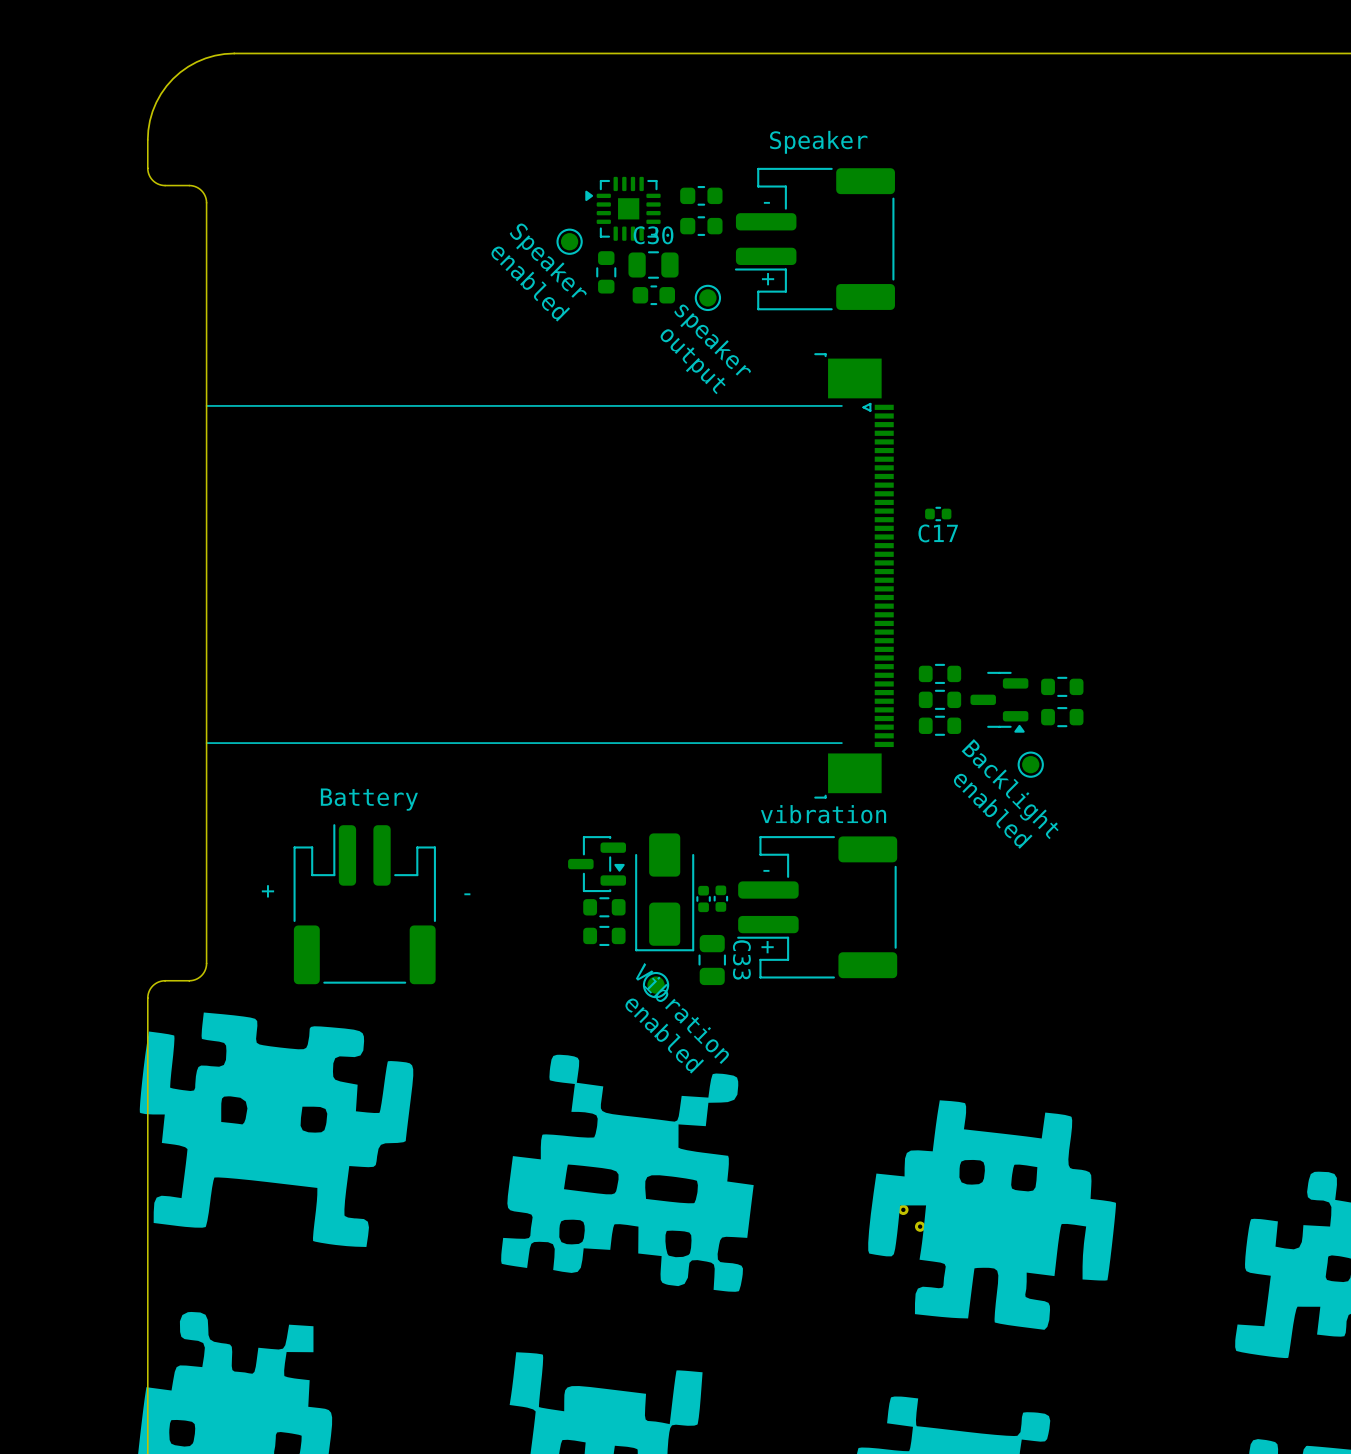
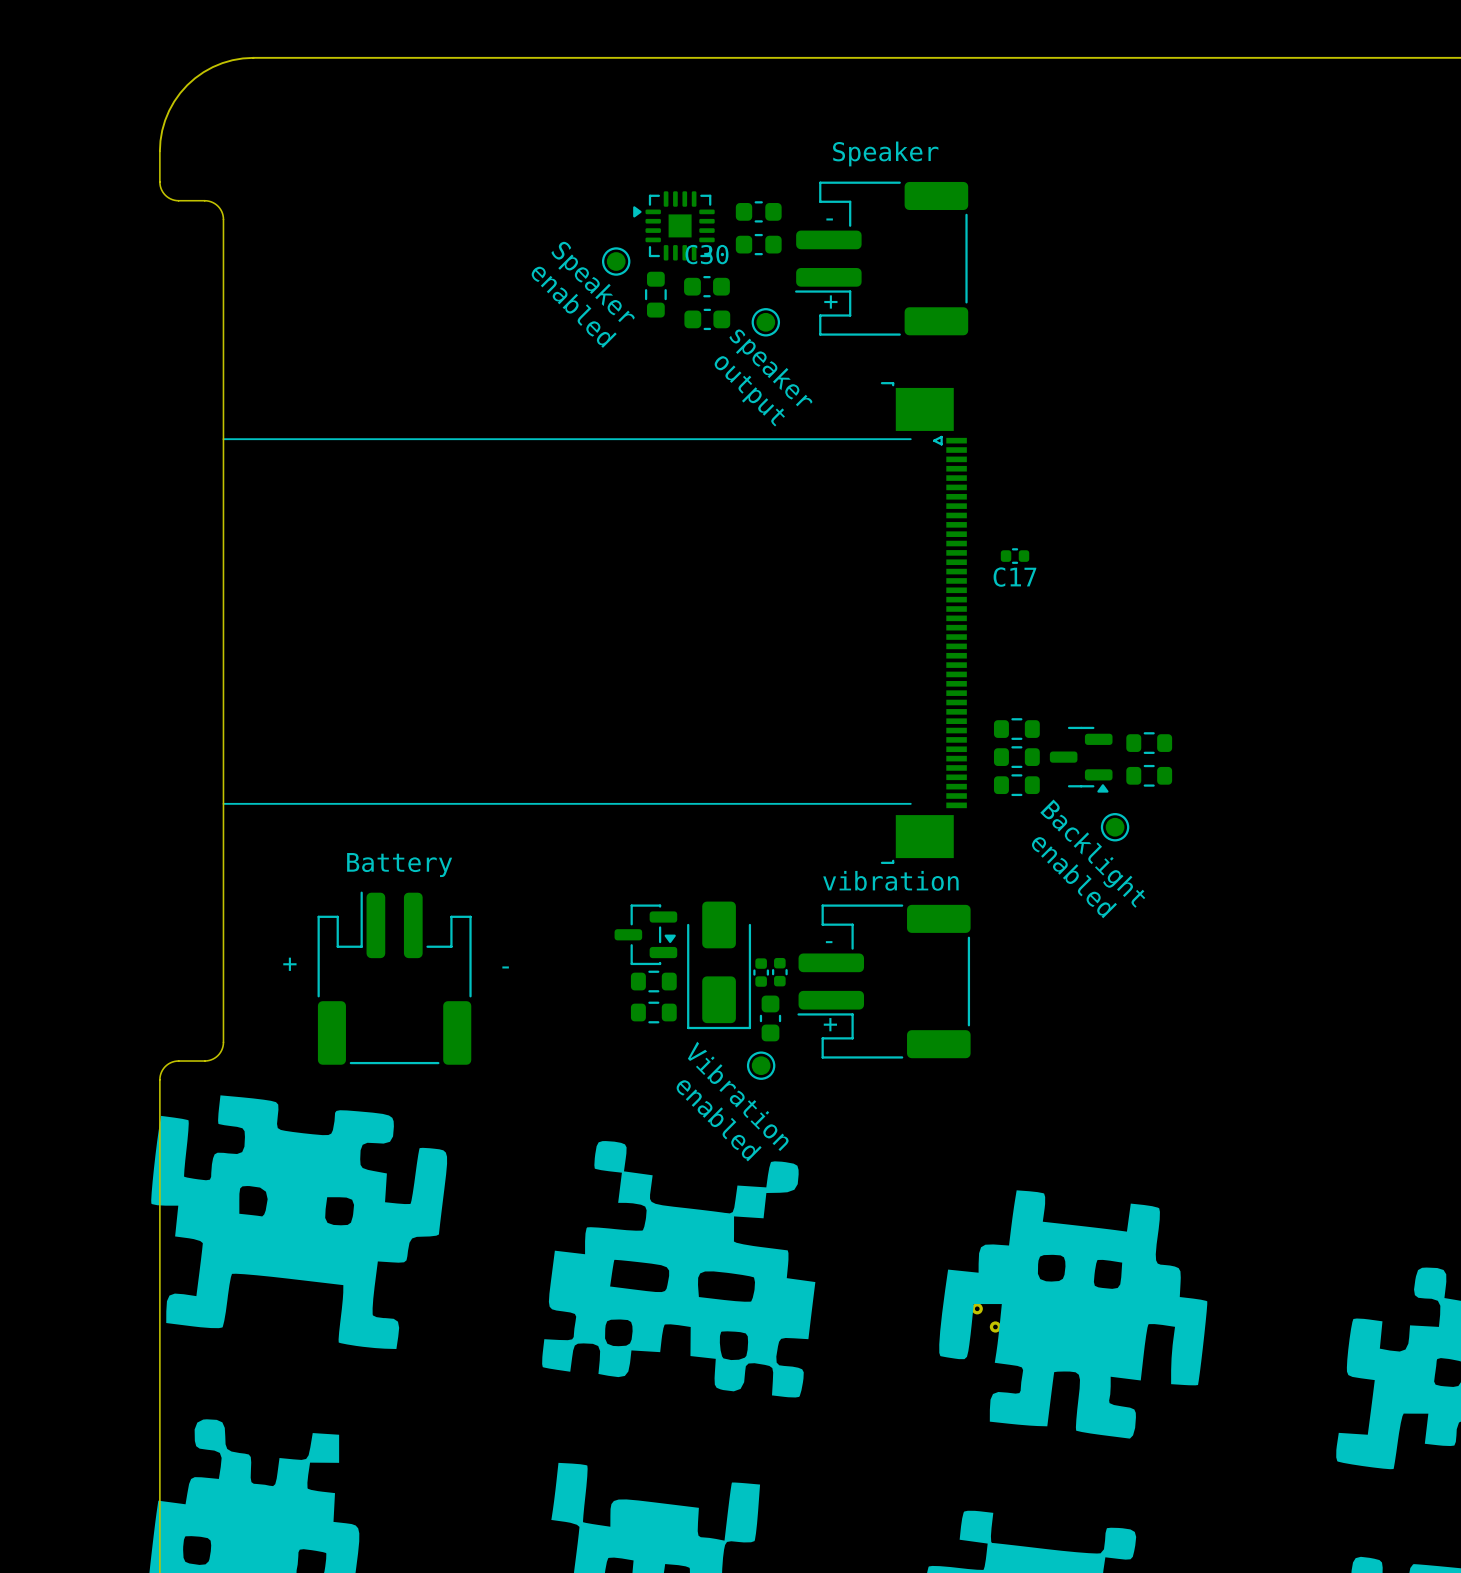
C30 footprint: [628, 251, 679, 279] -> [684, 276, 730, 298]
part: none -> (770, 1018)
C33: (712, 960) -> none
part position: (656, 985) -> (761, 1065)

